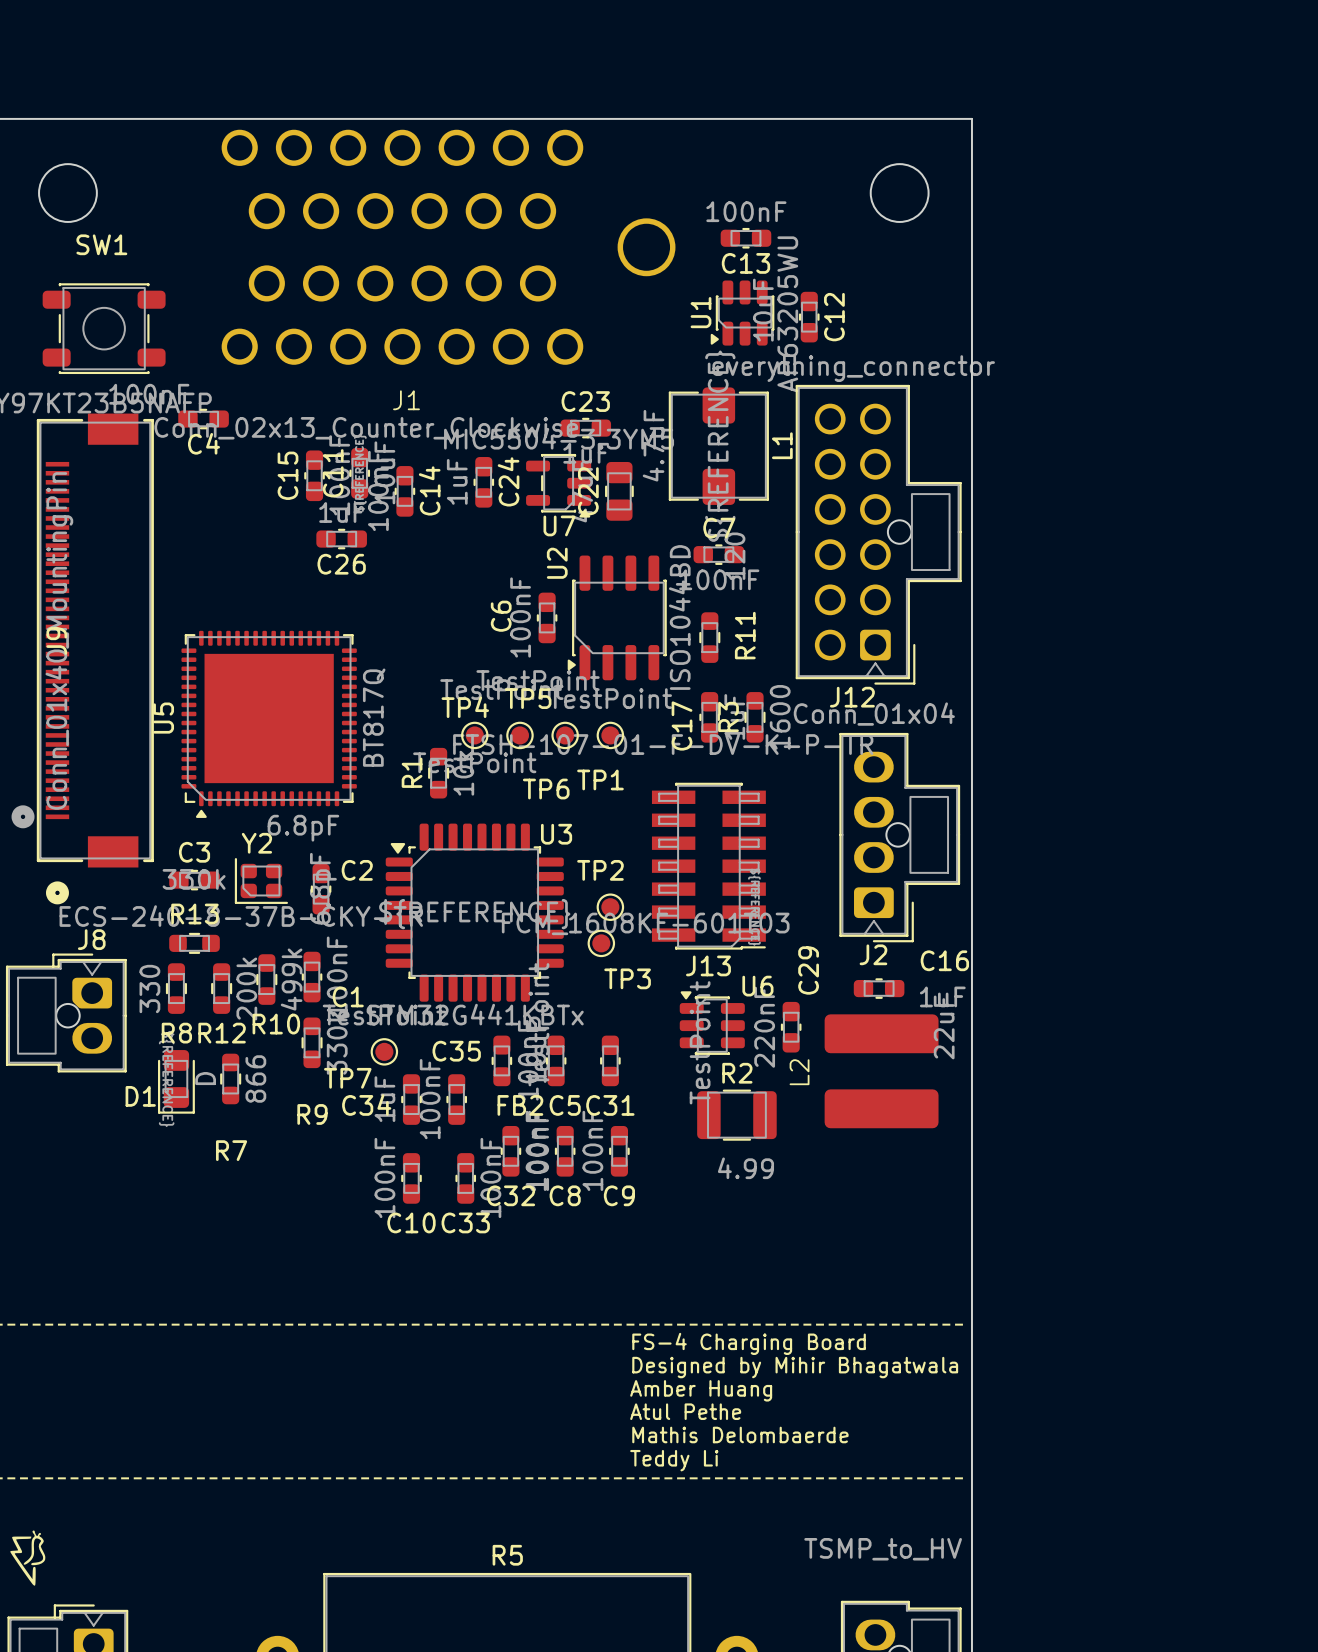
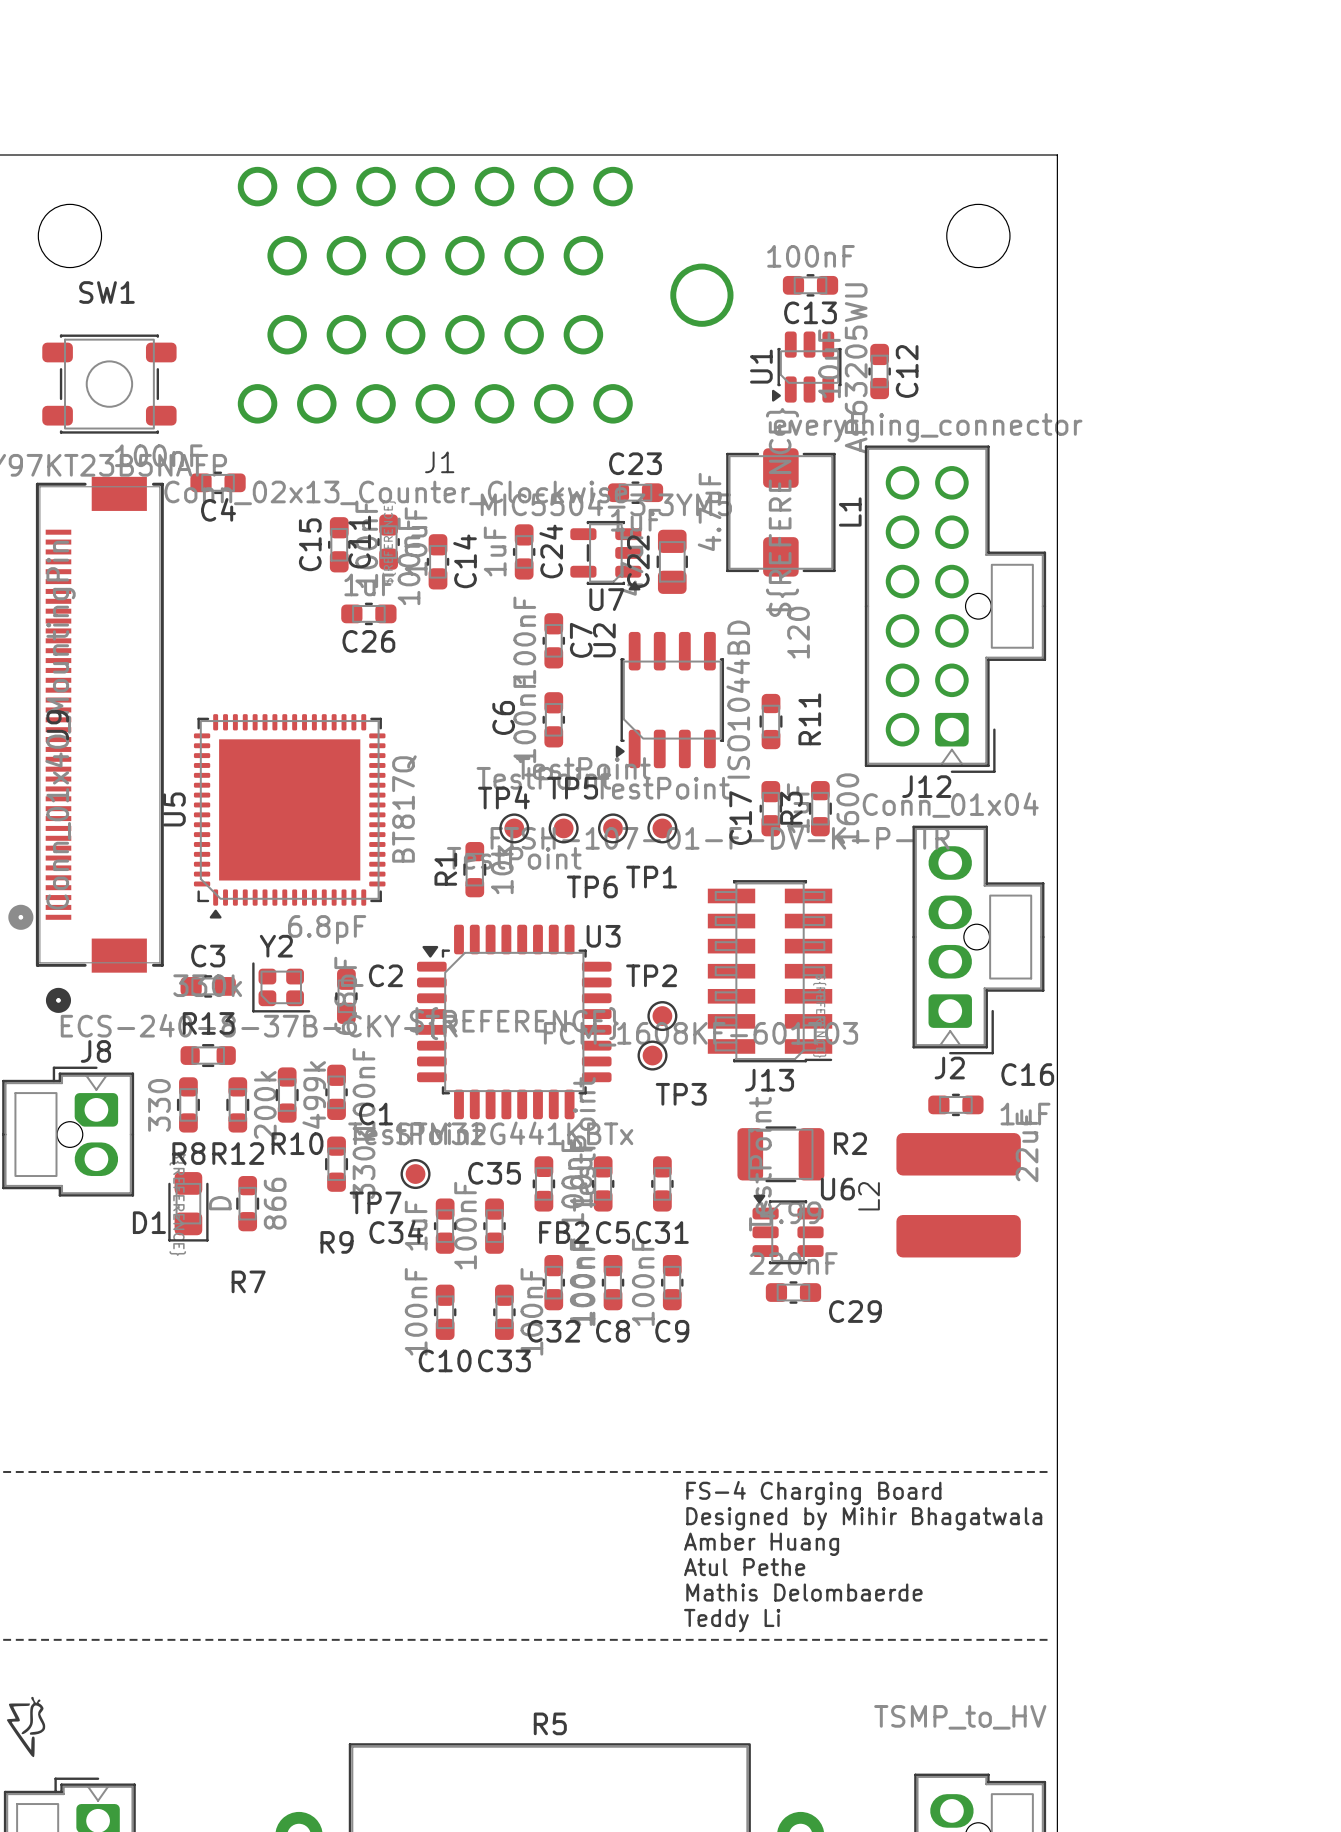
C7 rotation: 0° (718, 554) -> 90° clockwise (553, 640)
C7 position: (718, 554) -> (553, 640)
C6 position: (547, 617) -> (553, 719)
U6 position: (712, 1023) -> (788, 1229)
C29 rotation: 0° (791, 1027) -> 90° clockwise (793, 1292)
C29 position: (791, 1027) -> (793, 1292)
R2 name position: R2 (737, 1073) -> R2 (850, 1143)
R2 position: (736, 1115) -> (780, 1154)

